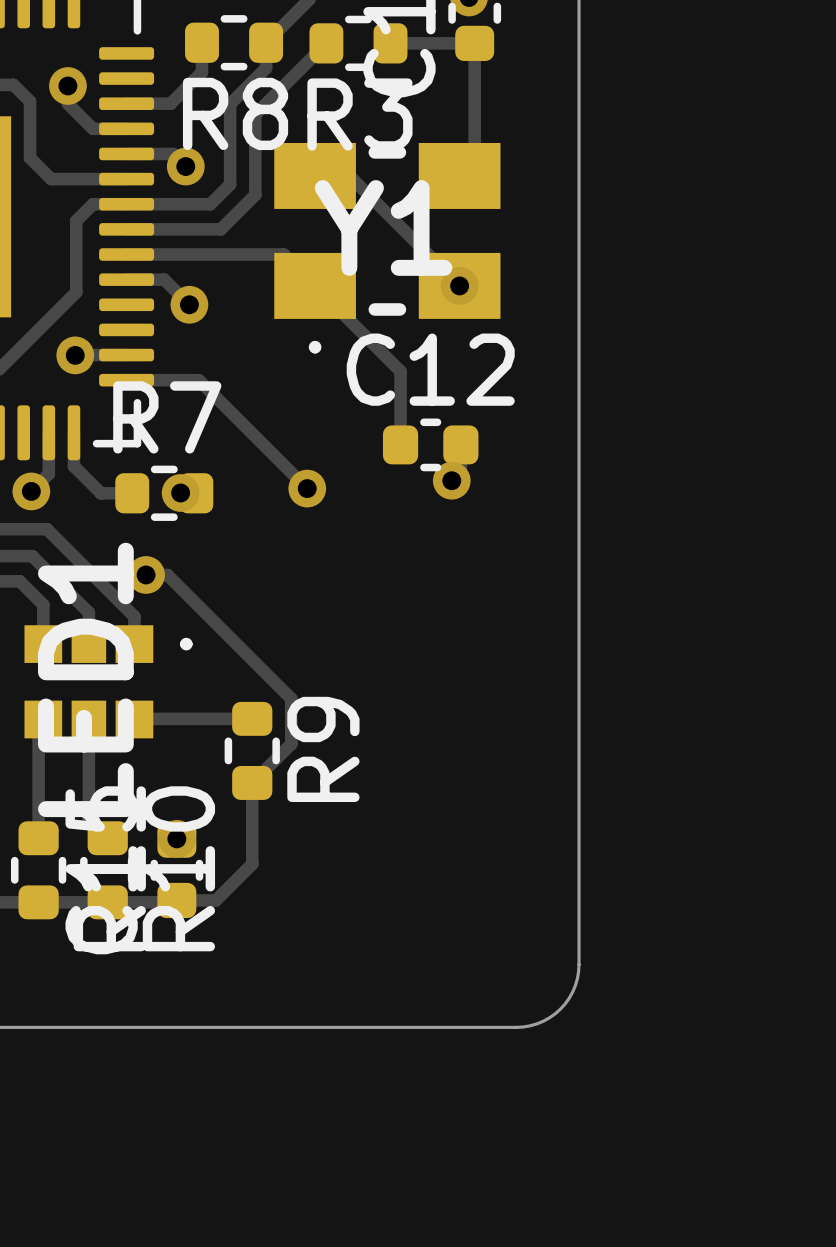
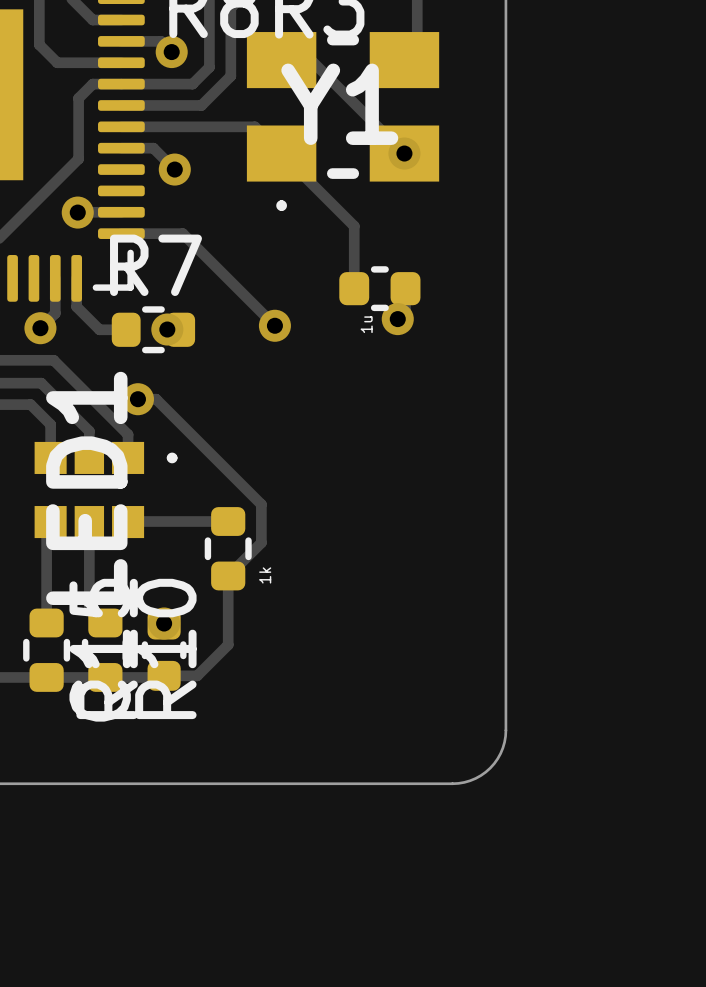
C12 name: C12 (430, 369) -> 1u (366, 324)
R9 name: R9 (323, 749) -> 1k (265, 575)

